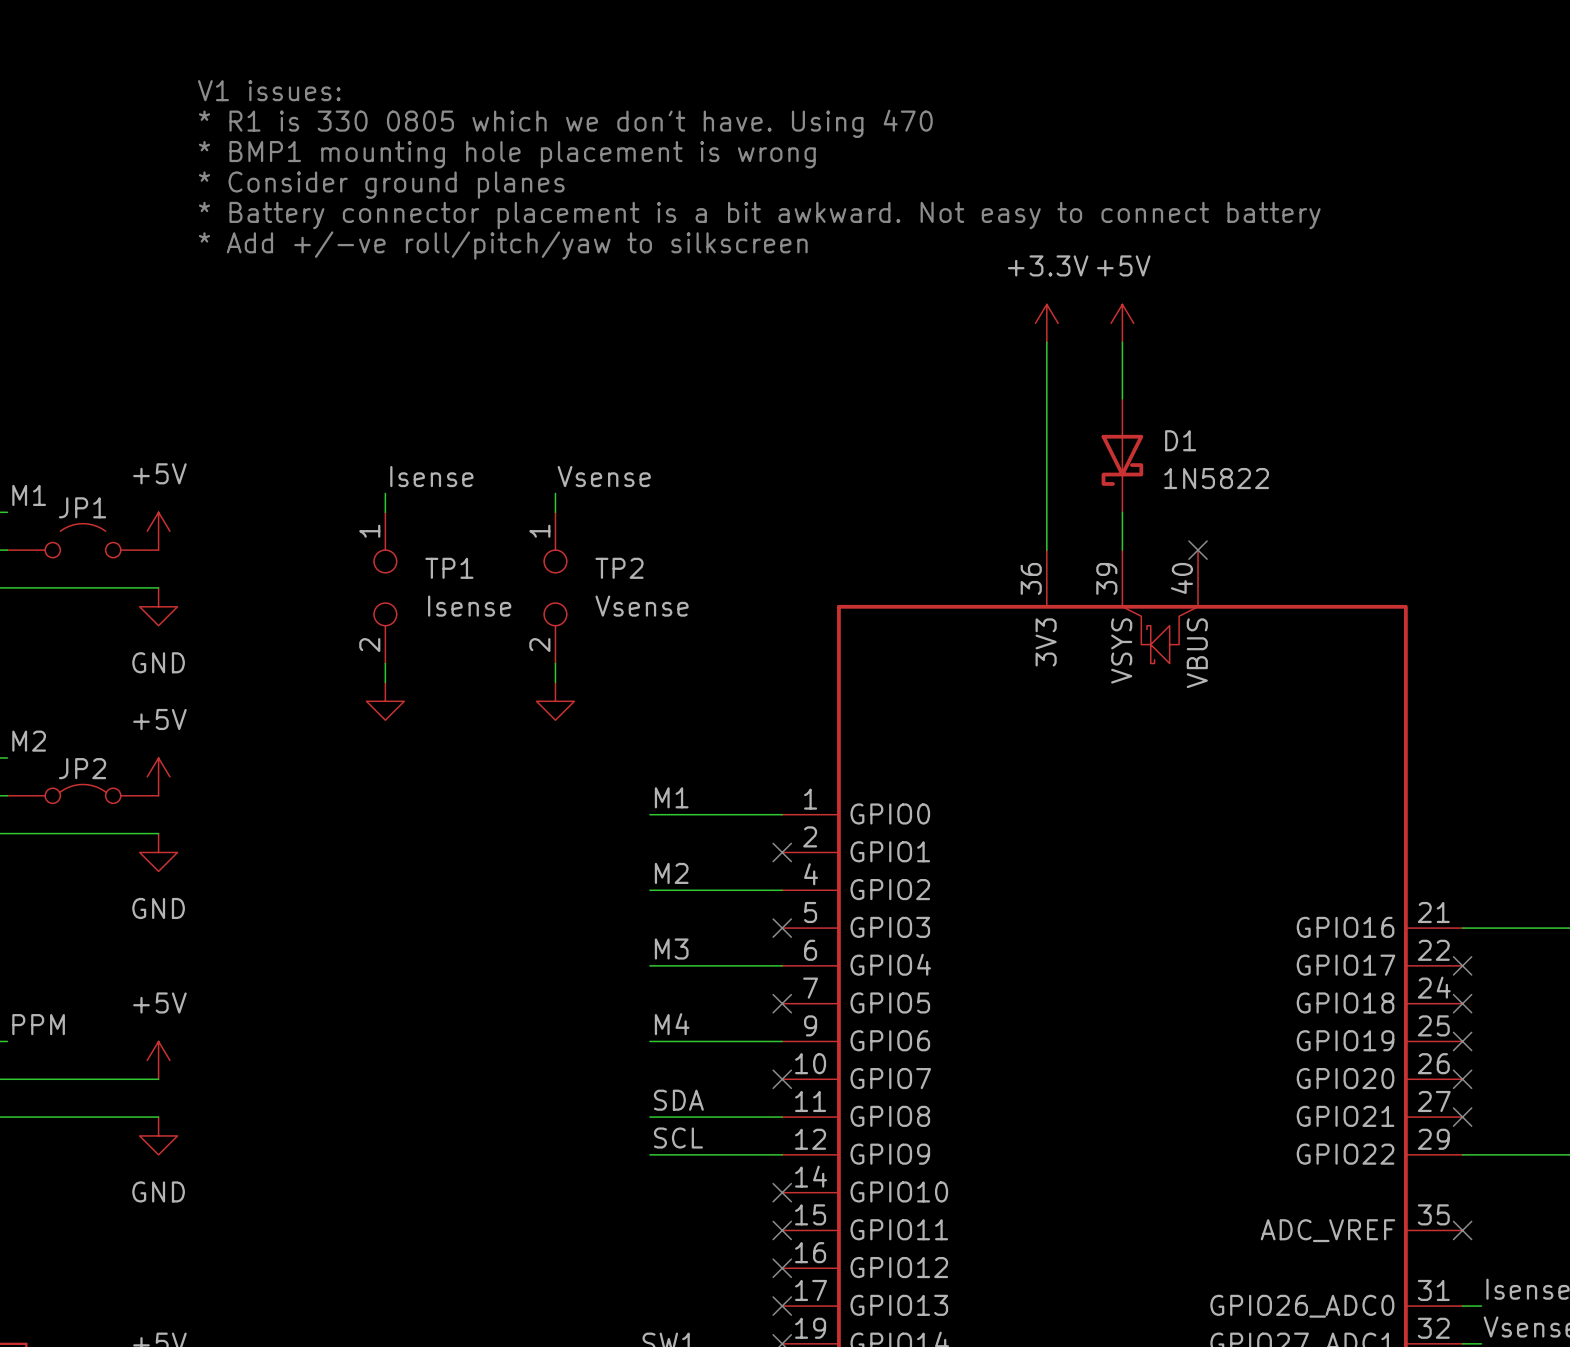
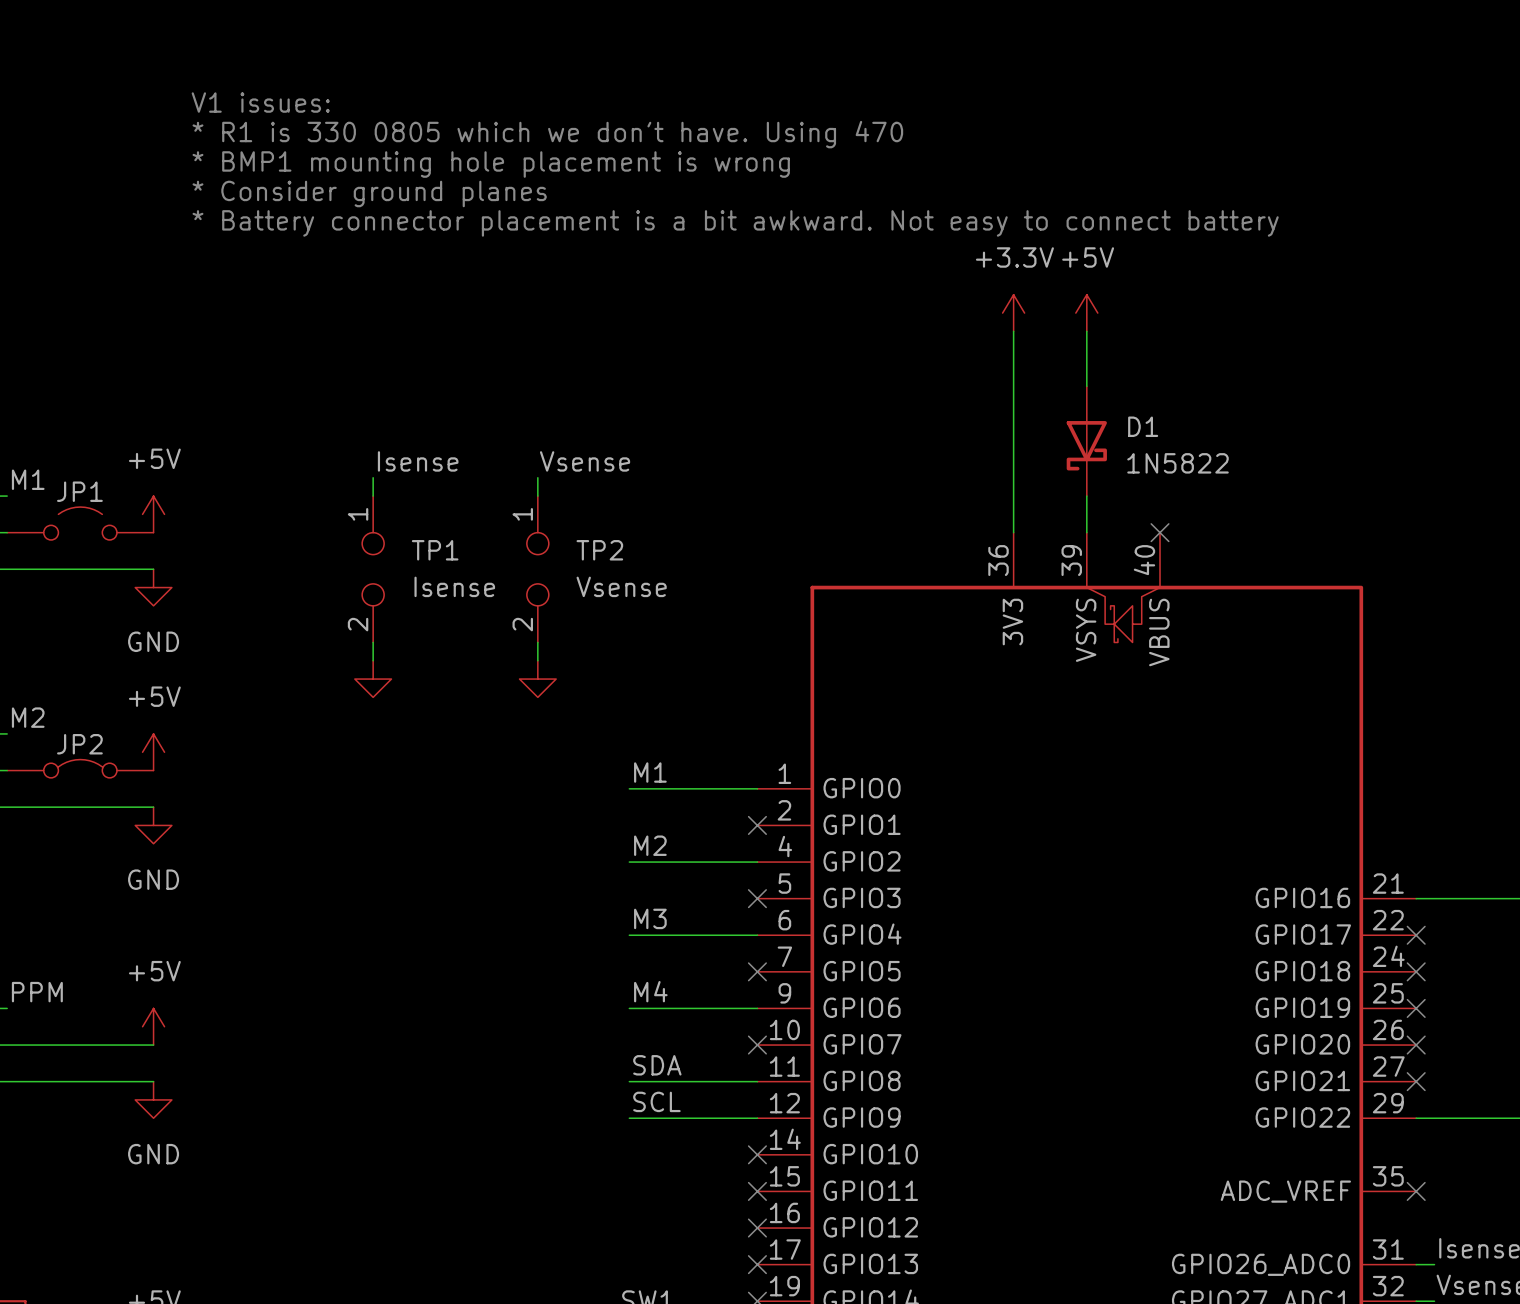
text position: V1 issues: (269, 90) -> V1 issues: (260, 102)
text position: * R1 is 330 0805 which we don't have. Using 470 (565, 123) -> * R1 is 330 0805 which we don't have. Using 470 (547, 134)
text position: * BMP1 mounting hole placement is wrong (507, 154) -> * BMP1 mounting hole placement is wrong (491, 164)
text position: * Consider ground planes (381, 185) -> * Consider ground planes (369, 193)
text position: * Battery connector placement is a bit awkward. Not easy to connect battery (759, 215) -> * Battery connector placement is a bit awkward. Not easy to connect battery (735, 223)
text: * Add +/-ve roll/pitch/yaw to silkscreen (503, 245) -> none

